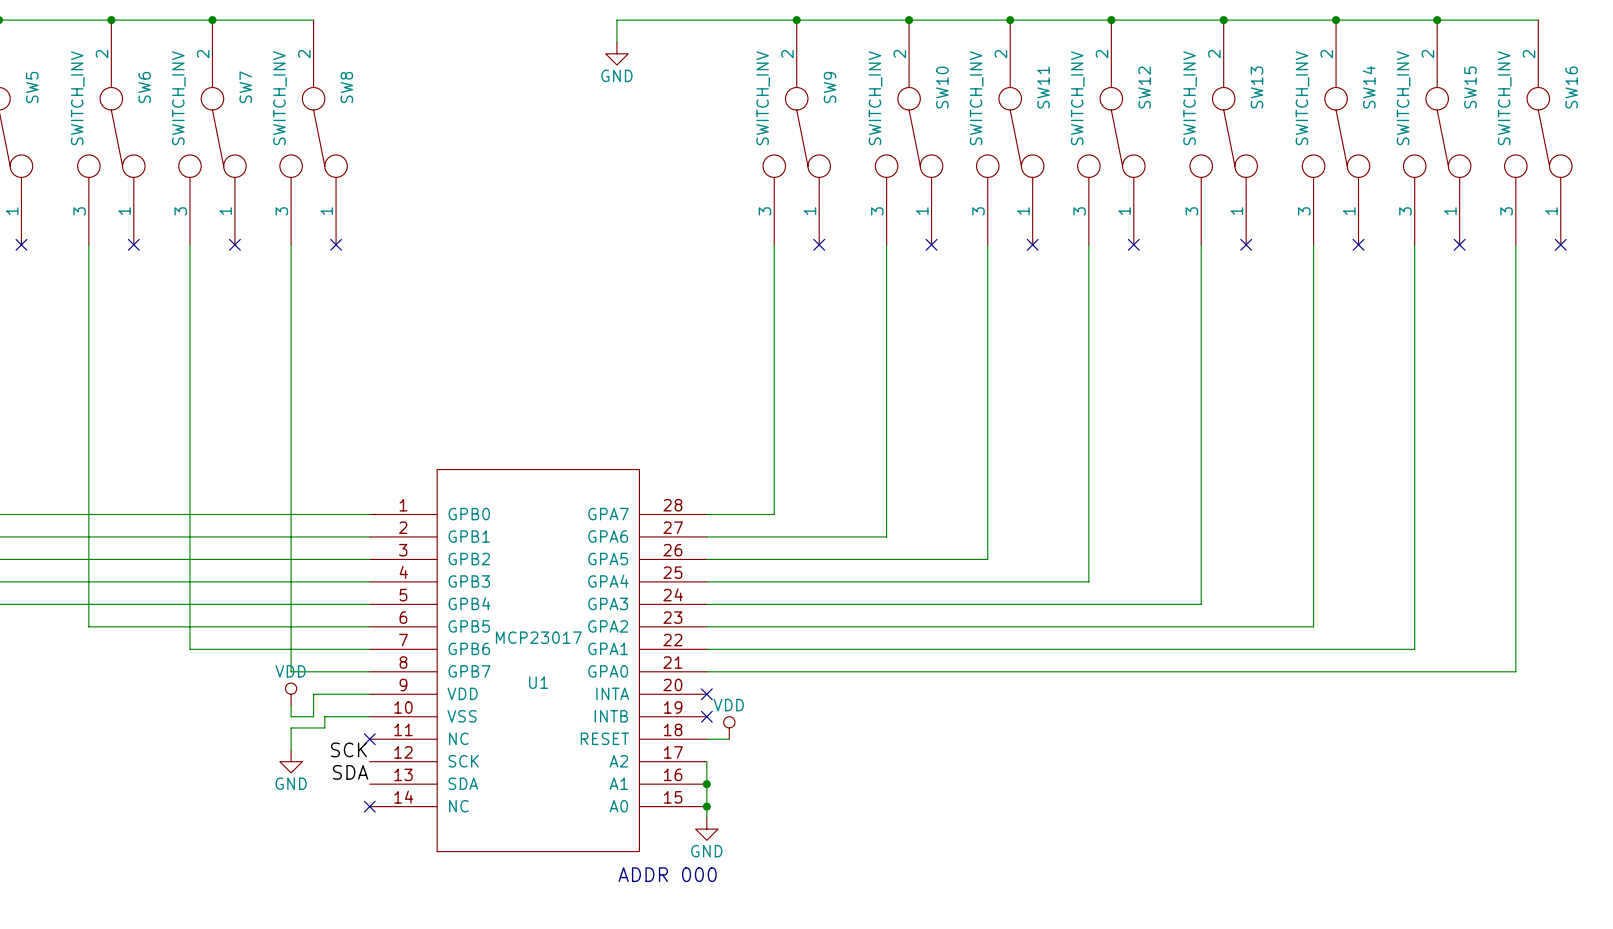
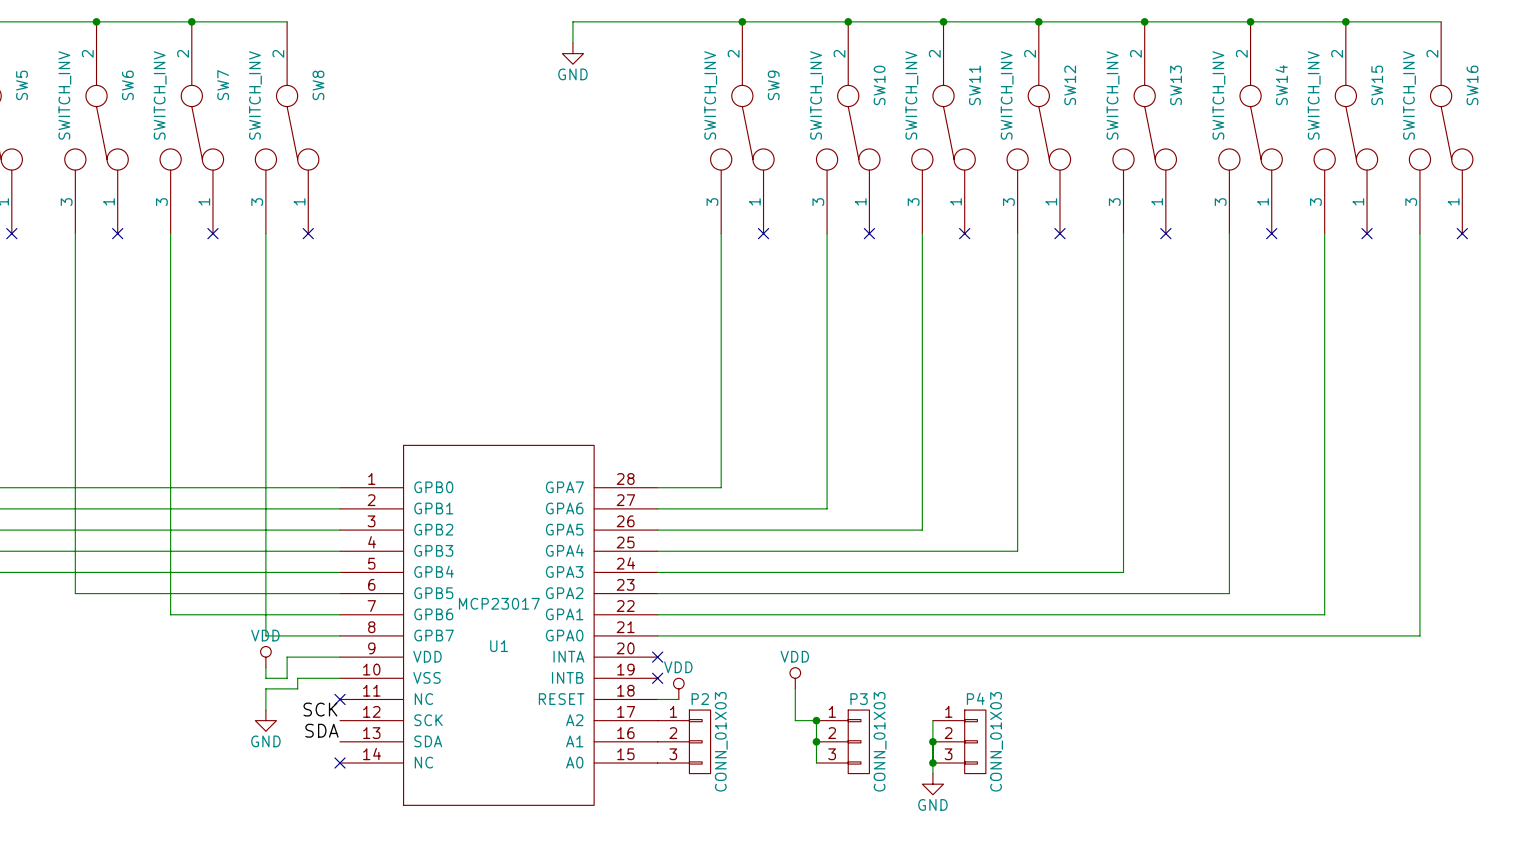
power symbol: none -> VDD (795, 678)
wire: none -> (795, 688) (795, 720) (816, 720) (816, 763)
wire: (706, 761) (706, 817) -> none
junction: none -> (816, 720)
wire: none -> (932, 720) (932, 773)
junction: (706, 784) -> none
P2: none -> CONN_01X03 (684, 741)
junction: none -> (816, 741)
P3: none -> CONN_01X03 (842, 741)
junction: none -> (932, 741)
P4: none -> CONN_01X03 (959, 741)
junction: (706, 806) -> none
junction: none -> (932, 763)
power symbol: GND (706, 829) -> none
power symbol: none -> GND (932, 784)
text: ADDR 000 (667, 874) -> none

